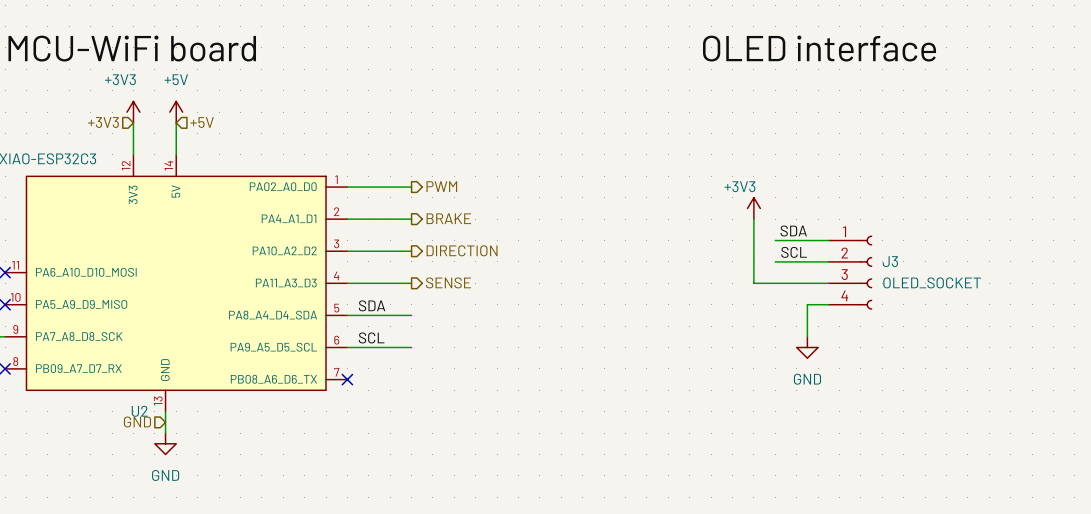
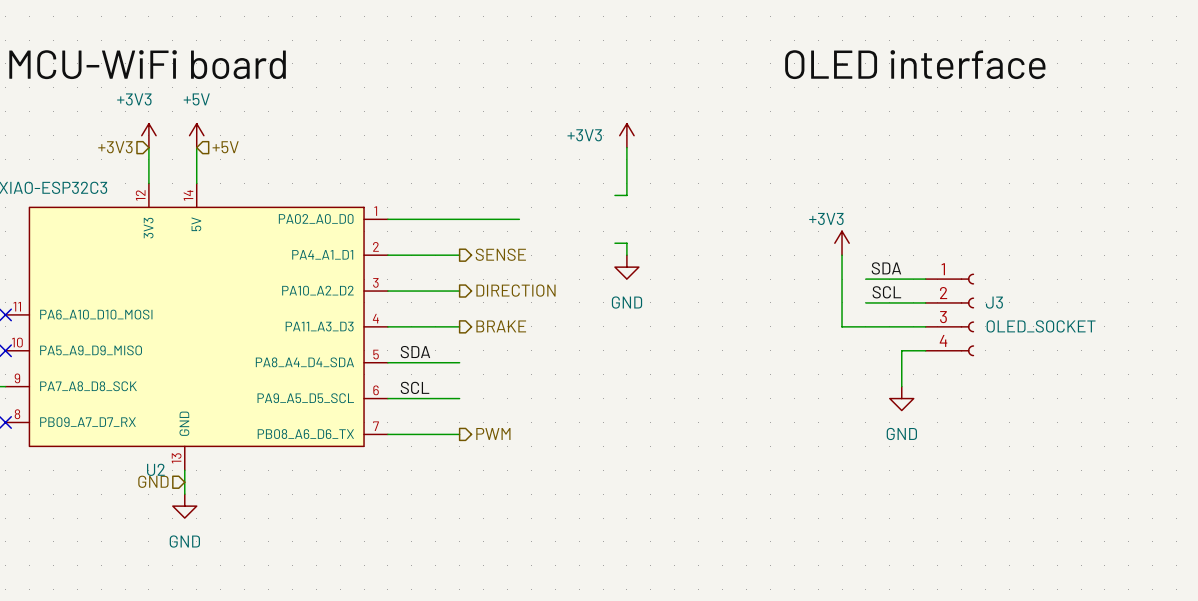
power symbol: none -> +3V3 (626, 135)
wire: none -> (626, 147) (626, 195) (614, 195)
hierarchical label position: PWM (441, 186) -> PWM (493, 433)
wire: none -> (459, 219) (519, 219)
wire: none -> (614, 243) (626, 243) (626, 255)
hierarchical label: BRAKE (448, 218) -> SENSE (500, 254)
power symbol: none -> GND (626, 267)
hierarchical label: SENSE (448, 282) -> BRAKE (501, 326)
wire: none -> (387, 434) (459, 434)
no-connect mark: (347, 379) -> none

